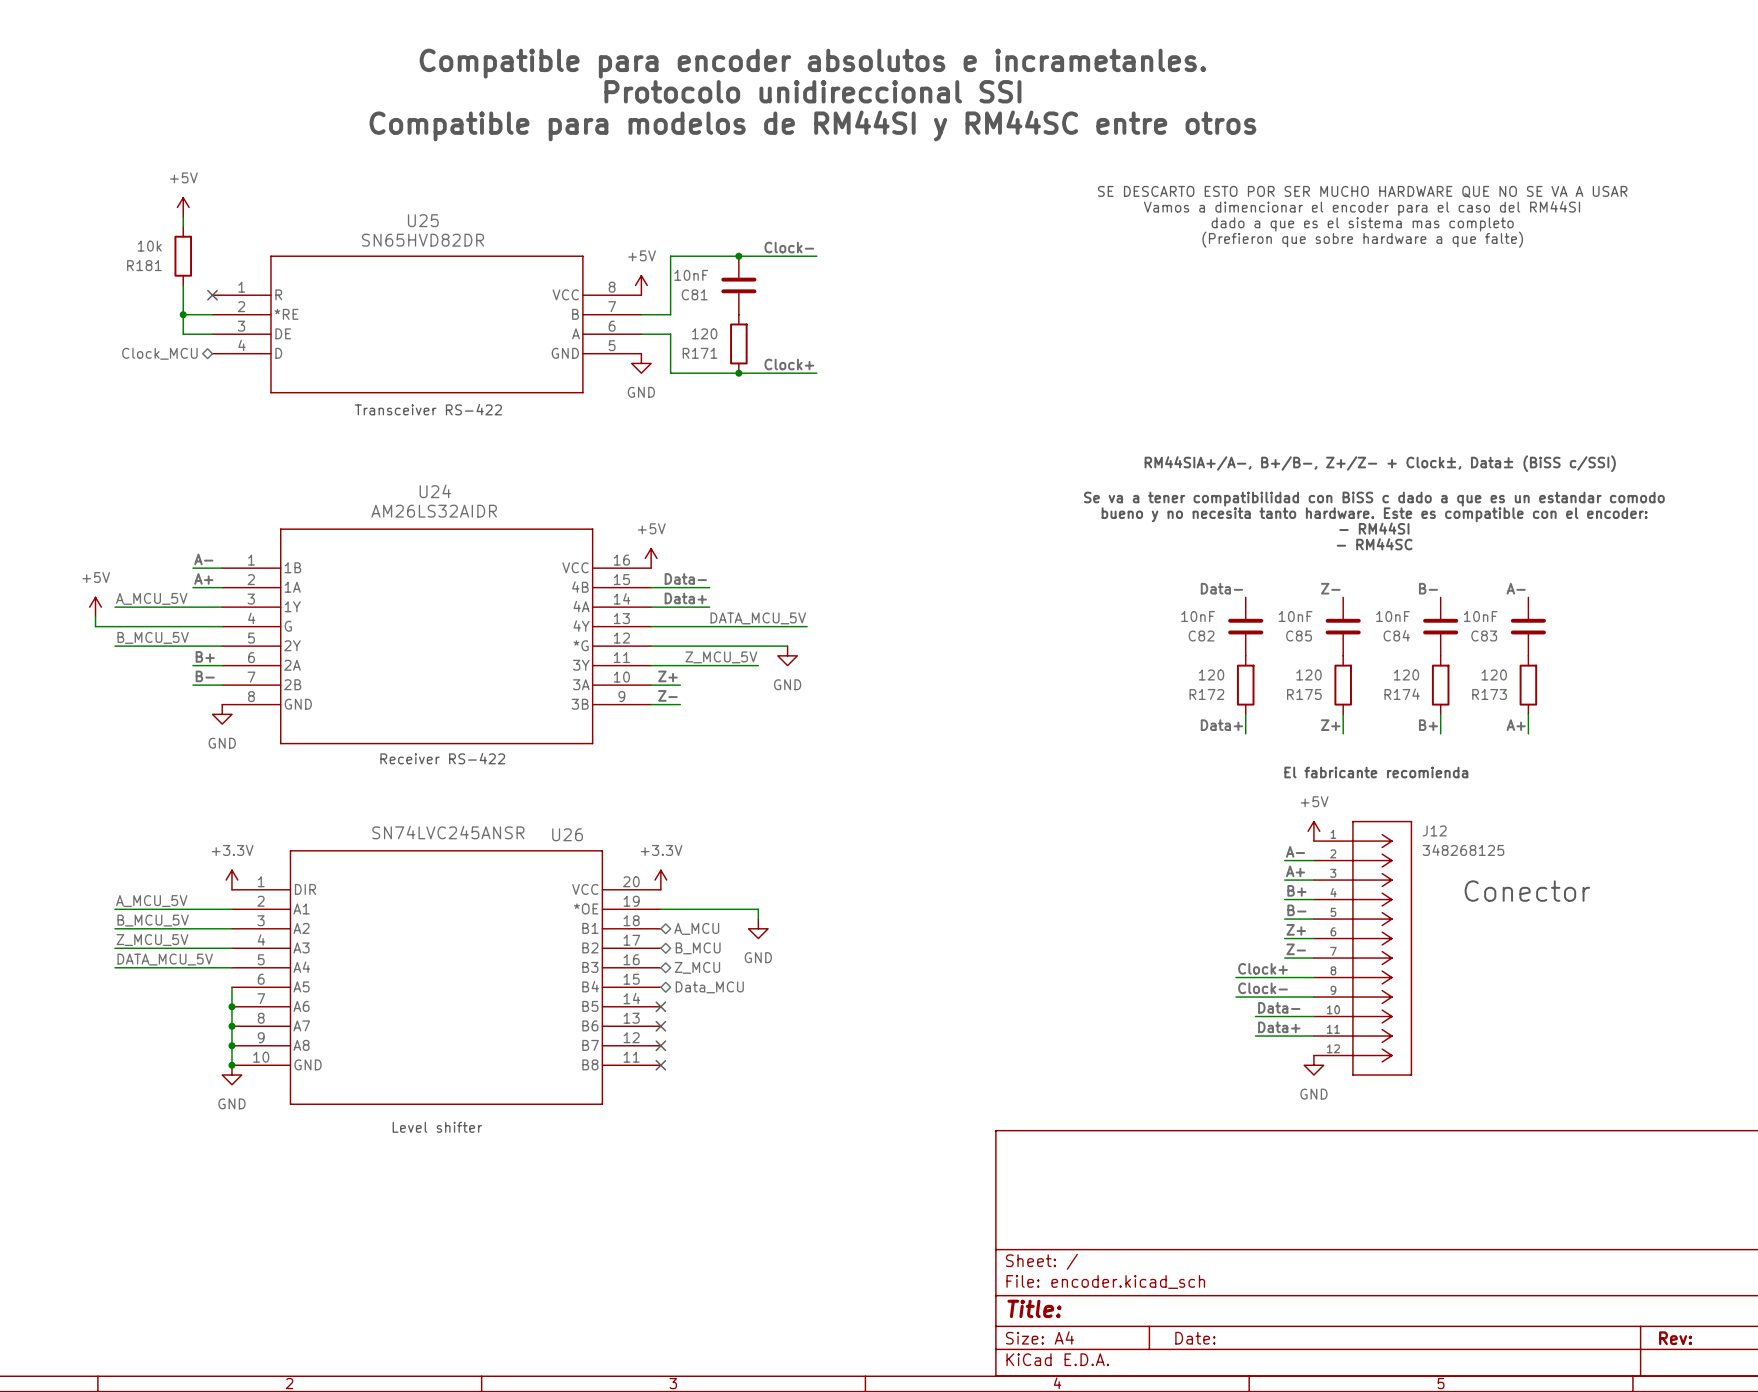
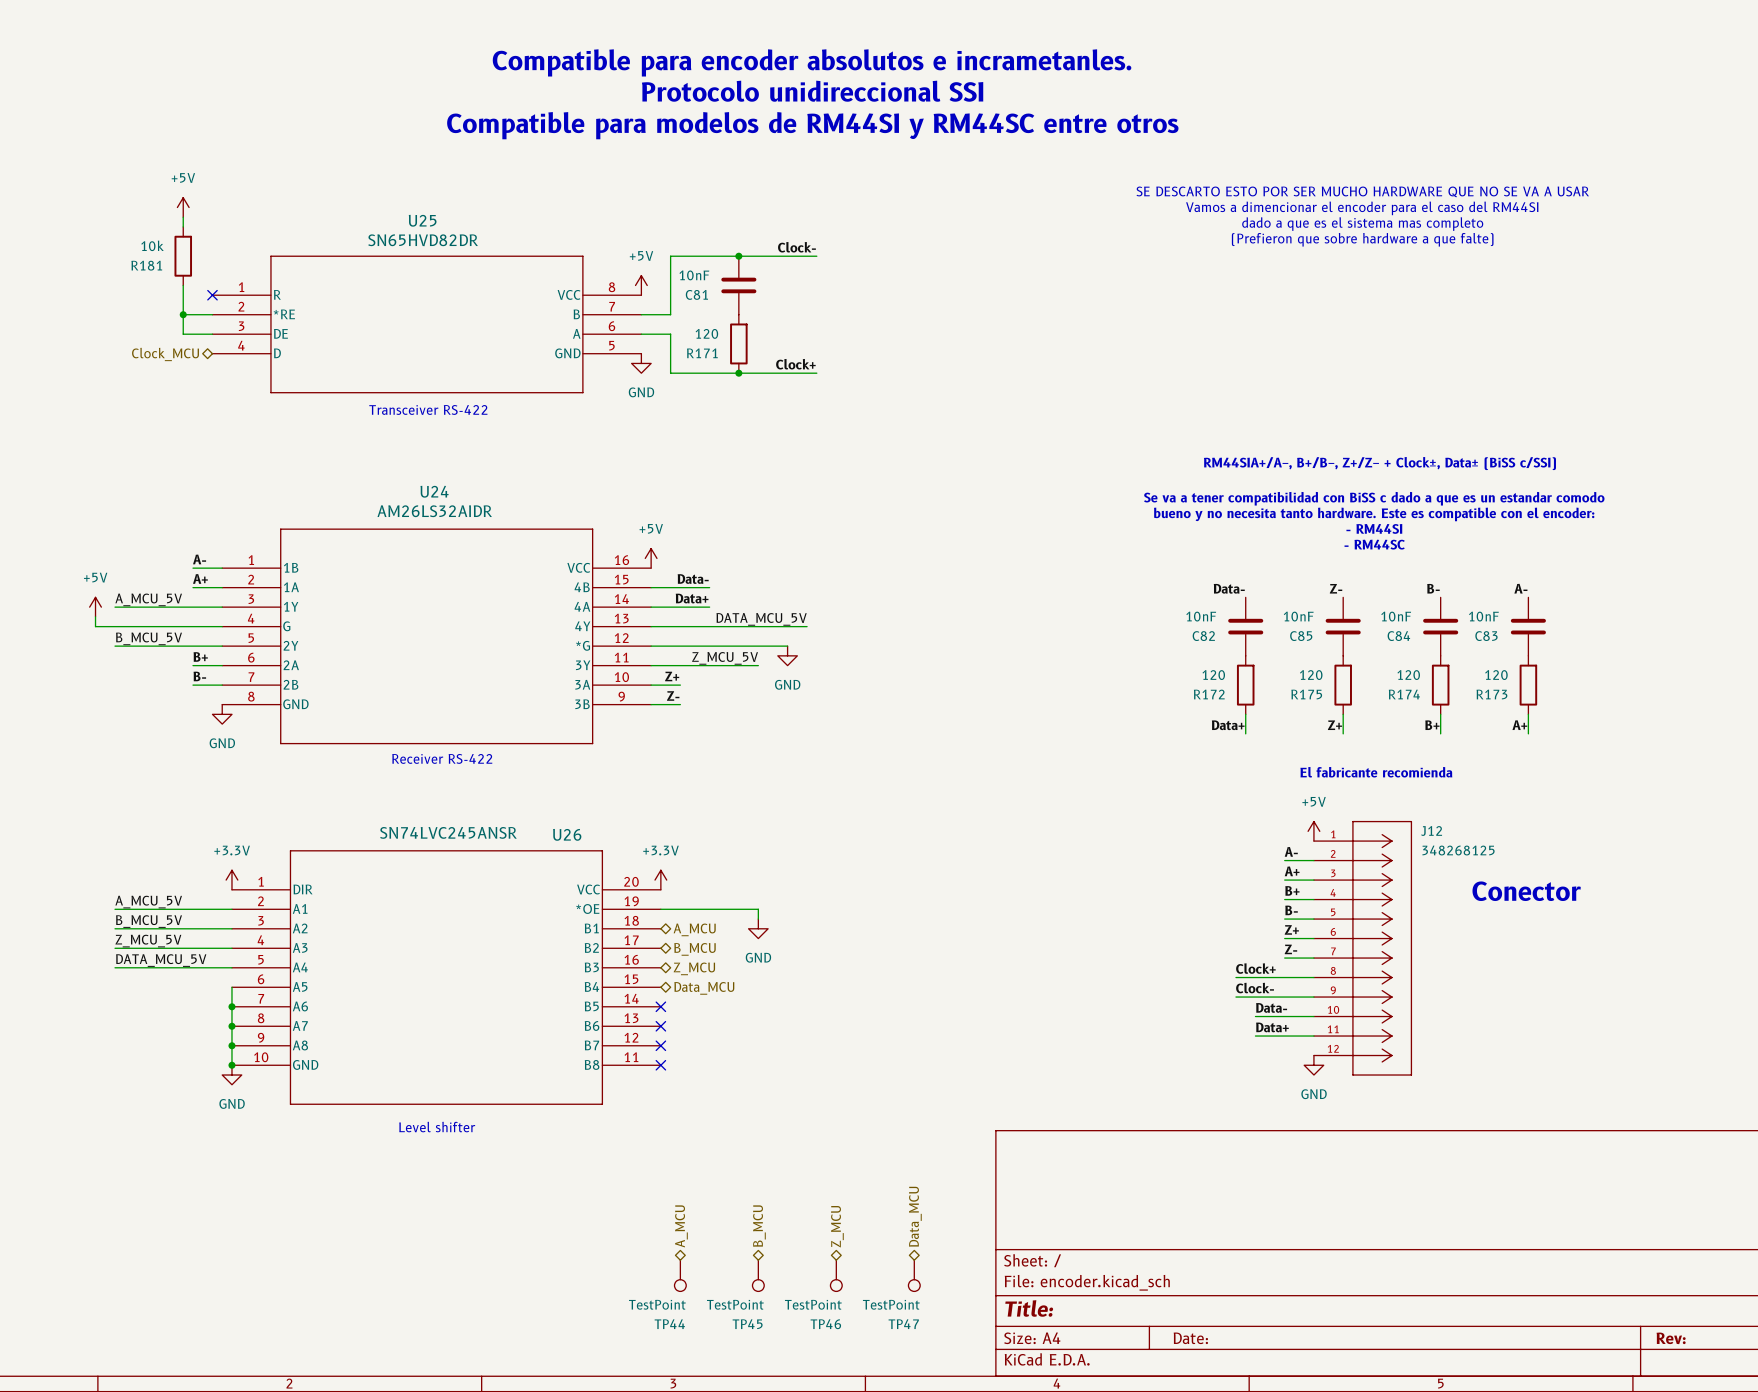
hierarchical label: none -> Data_MCU (915, 1216)
hierarchical label: none -> B_MCU (759, 1226)
hierarchical label: none -> Z_MCU (837, 1226)
hierarchical label: none -> A_MCU (681, 1226)
TP44: none -> TestPoint (680, 1275)
TP45: none -> TestPoint (758, 1275)
TP46: none -> TestPoint (836, 1275)
TP47: none -> TestPoint (914, 1275)

